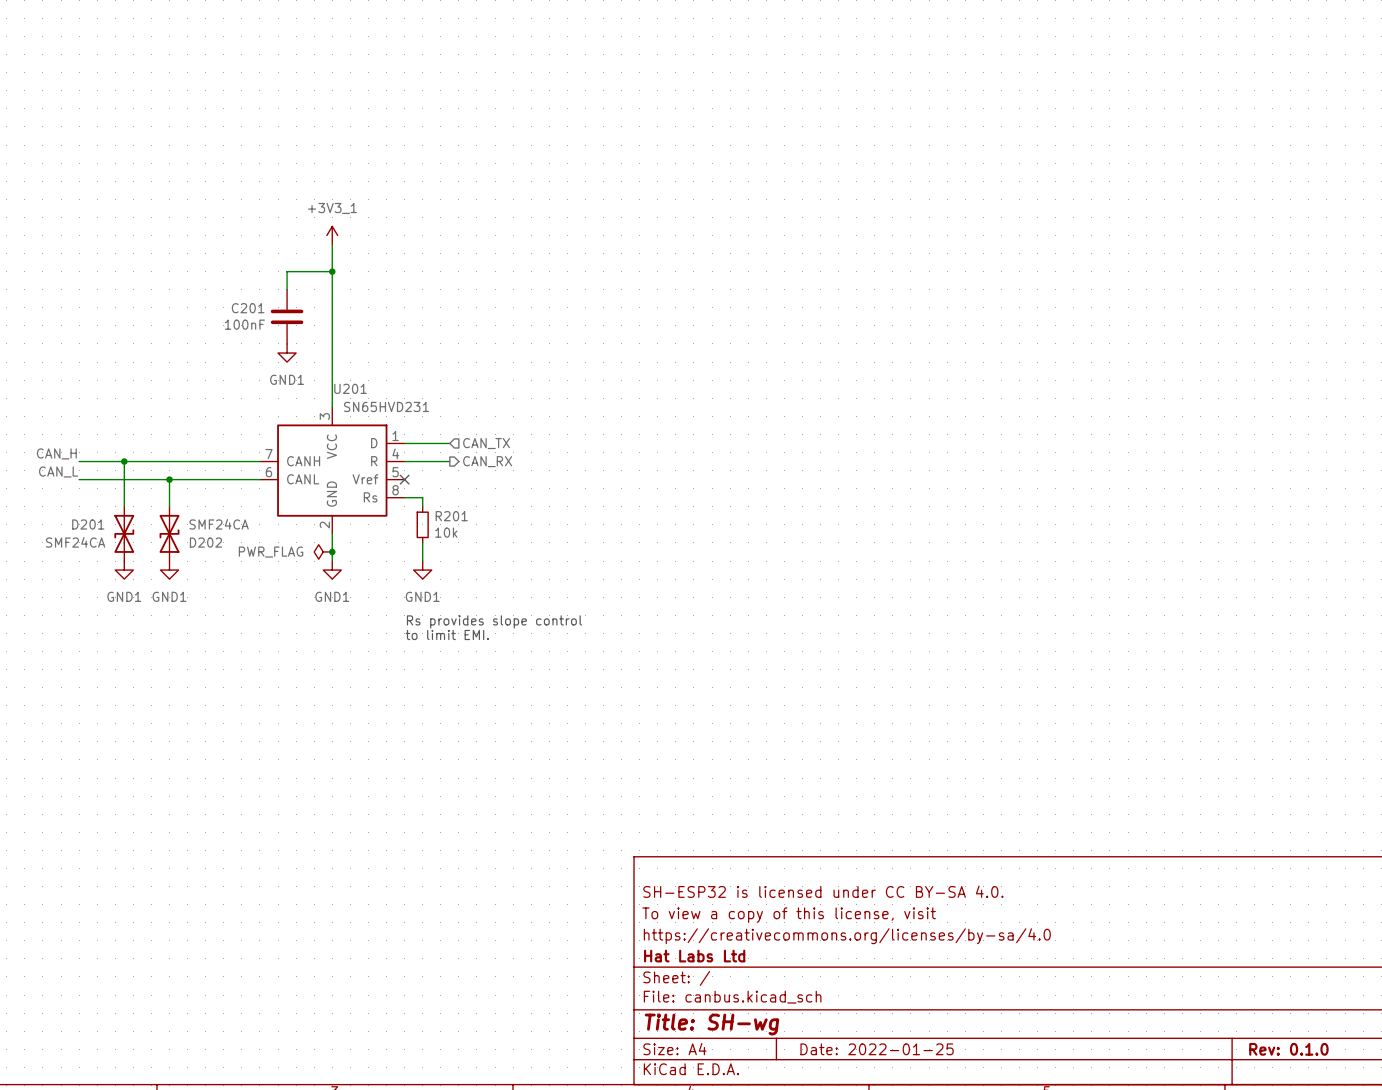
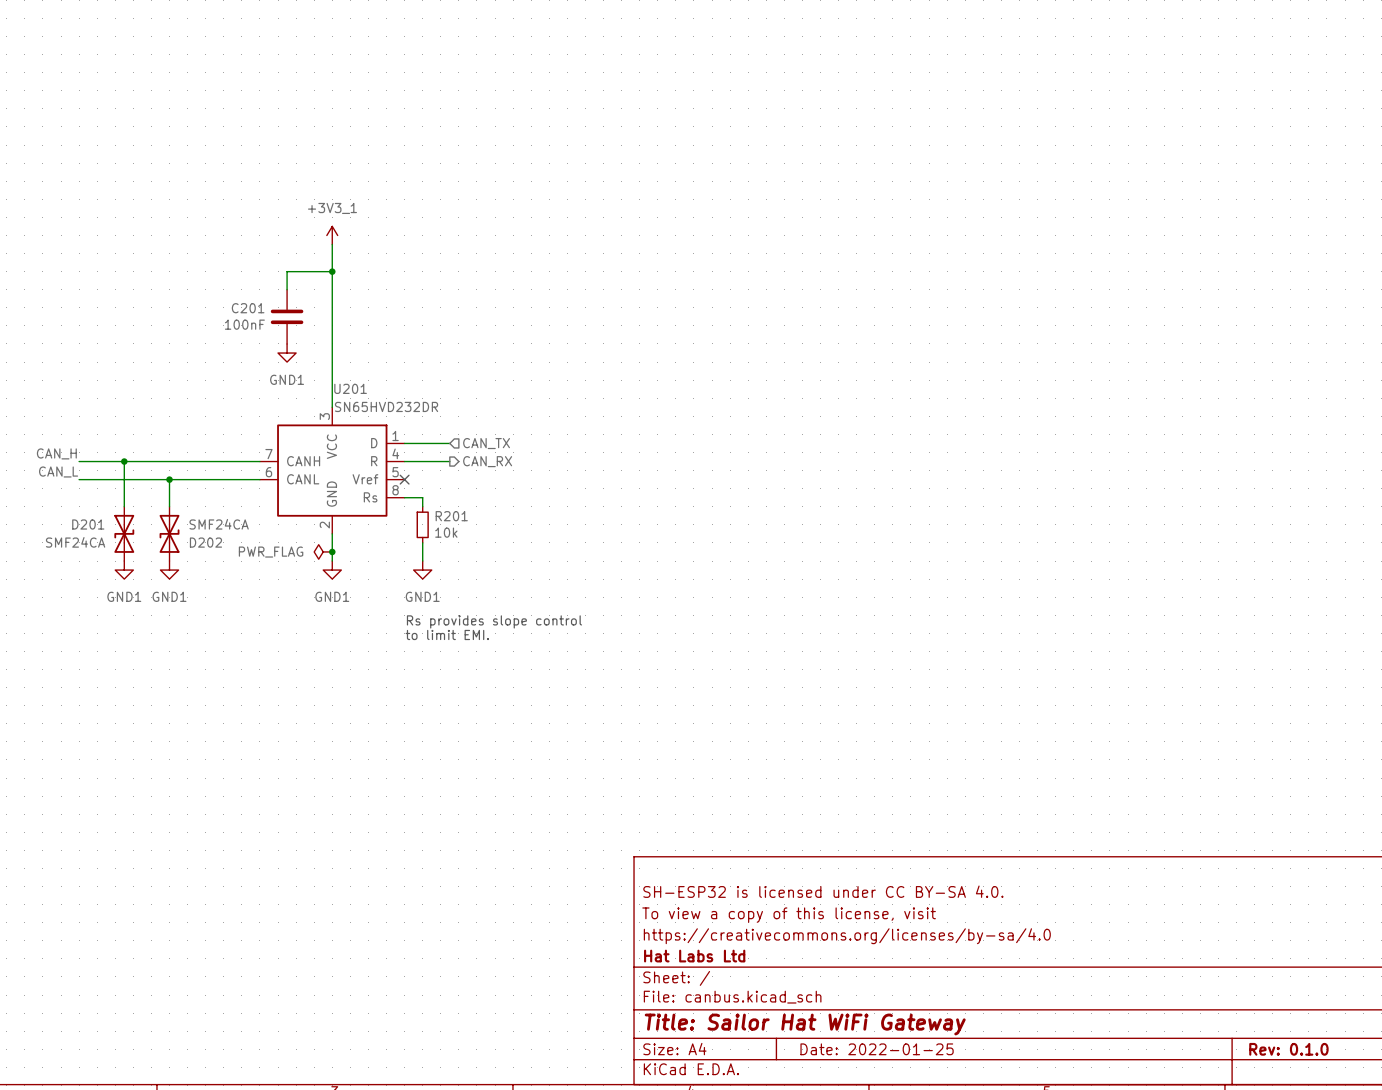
U201 value: SN65HVD231 (386, 406) -> SN65HVD232DR (386, 406)
title block: Title: SH-wg (711, 1024) -> Title: Sailor Hat WiFi Gateway (805, 1024)

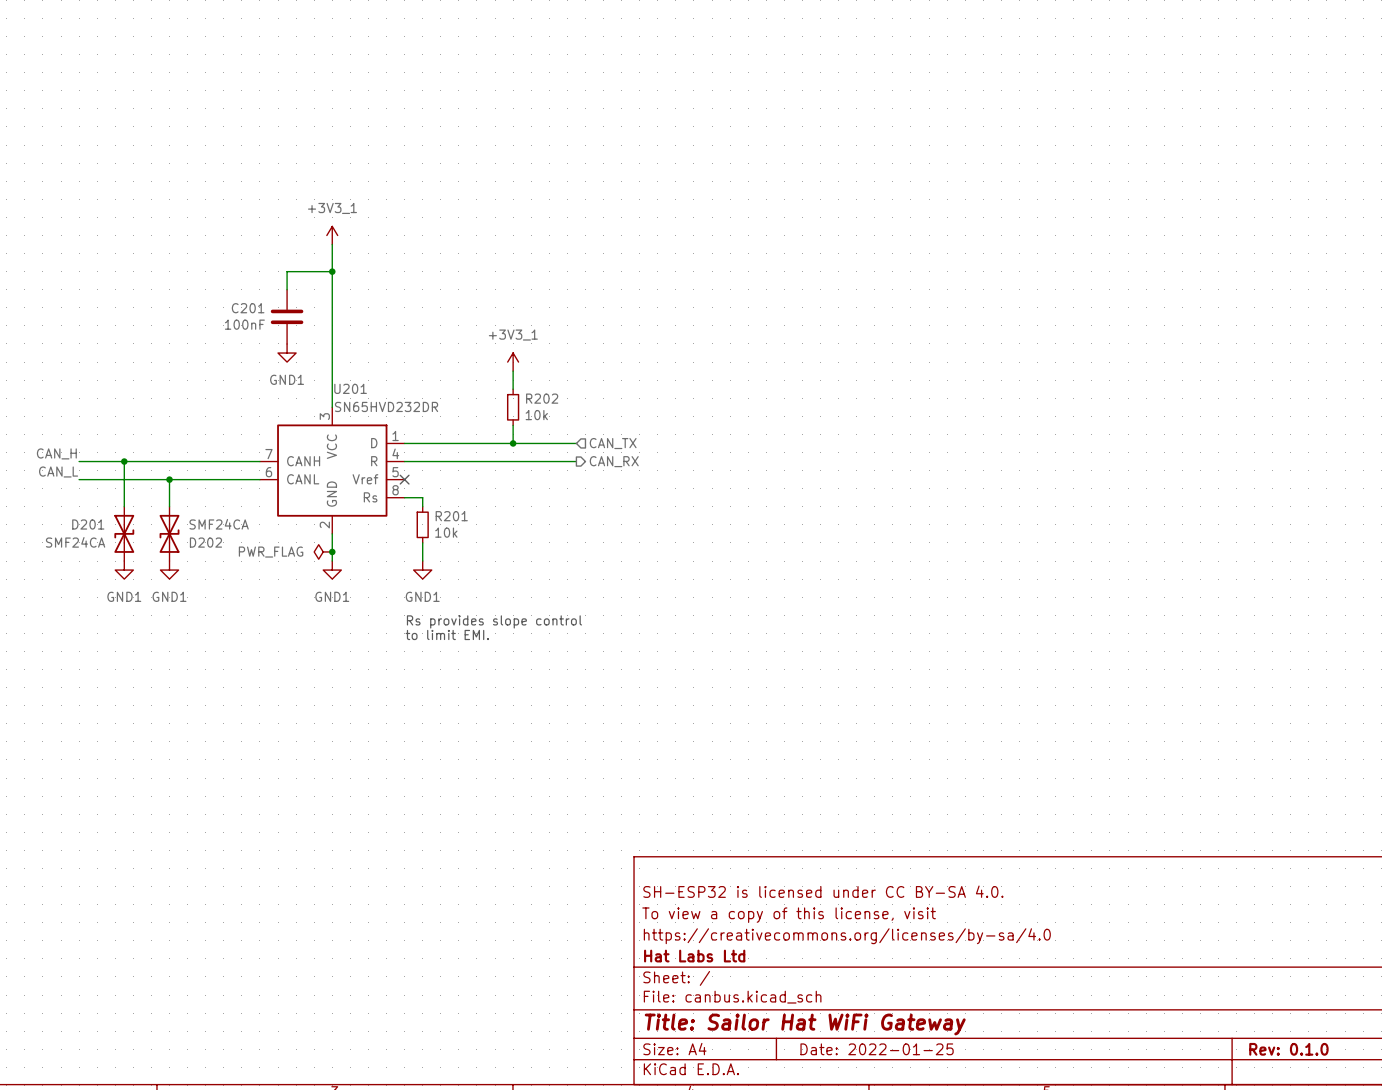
power symbol: none -> +3V3_1 (513, 362)
wire: none -> (513, 371) (513, 389)
R202: none -> 10k (513, 407)
wire: none -> (513, 425) (513, 443)
wire: none -> (449, 443) (576, 443)
hierarchical label position: CAN_TX (486, 443) -> CAN_TX (613, 443)
junction: none -> (513, 443)
wire: none -> (449, 461) (576, 461)
hierarchical label position: CAN_RX (487, 461) -> CAN_RX (614, 461)

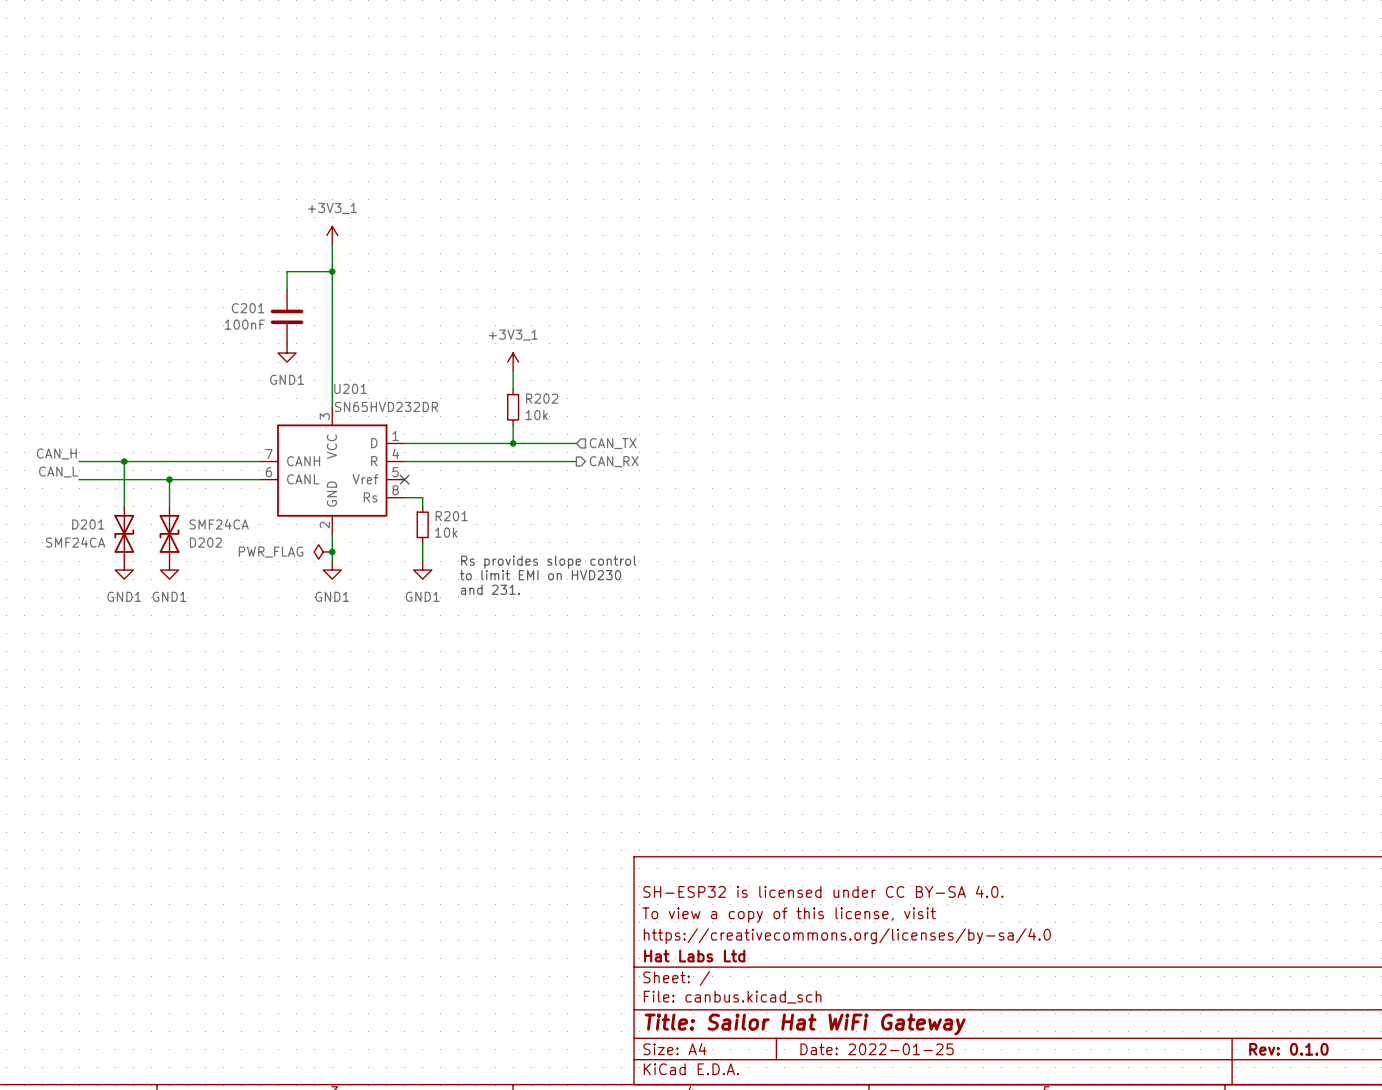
text: none -> to limit EMI on HVD230 (540, 575)
text: none -> and 231. (490, 589)
text position: Rs provides slope control (494, 621) -> Rs provides slope control (548, 562)
text: to limit EMI. (447, 634) -> none

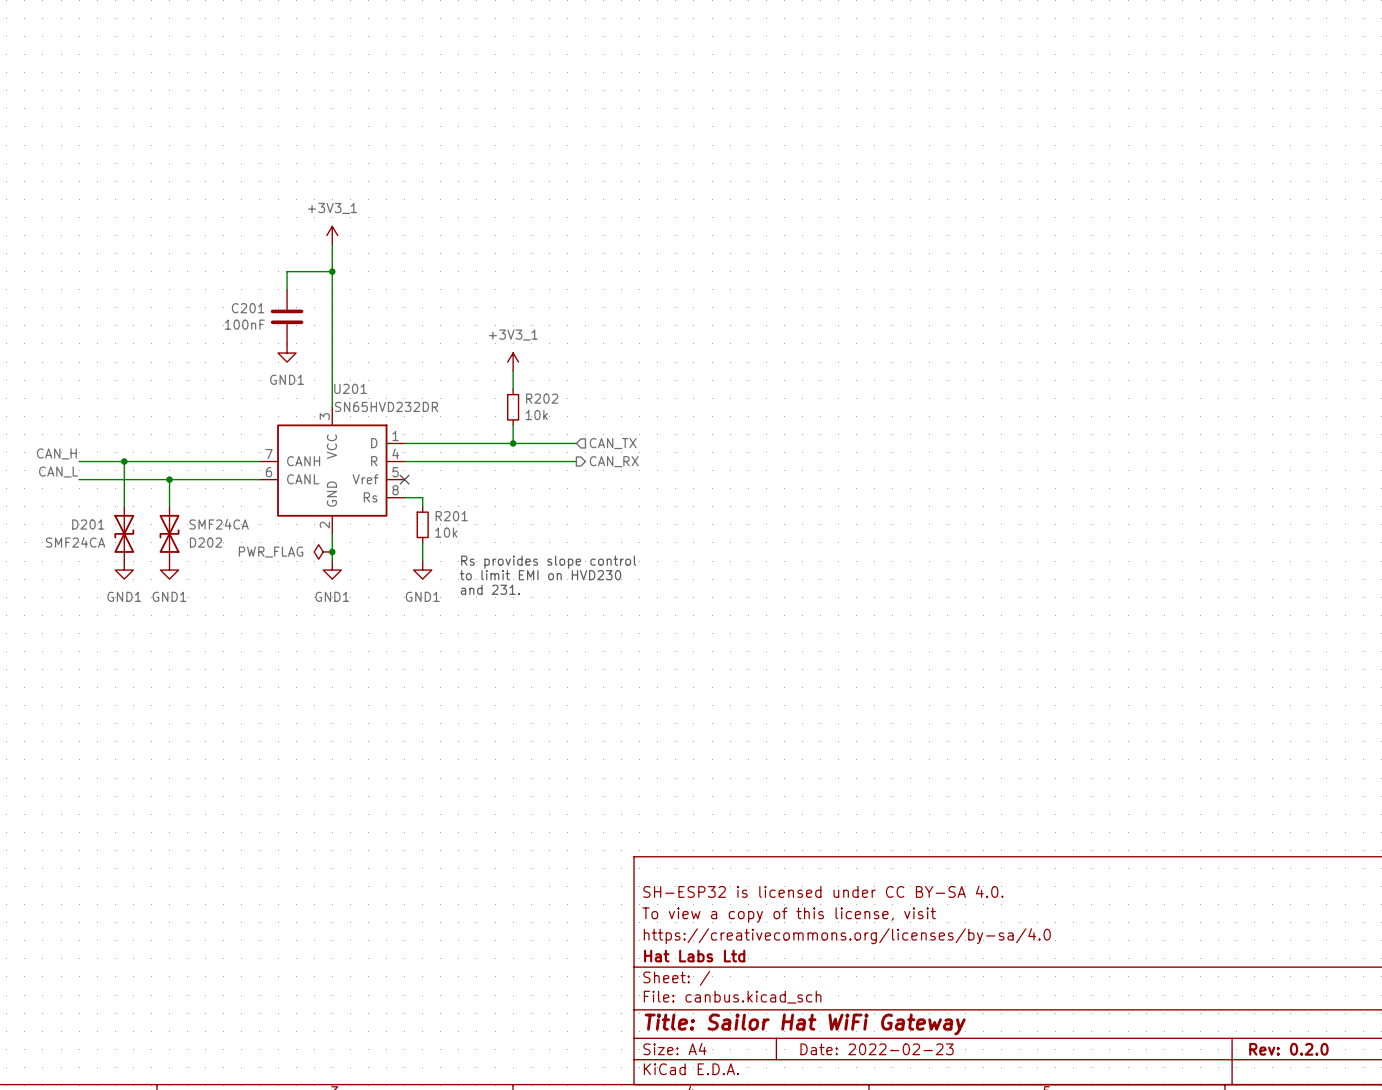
title block: Date: 2022-01-25 (877, 1049) -> Date: 2022-02-23 (877, 1049)
title block: Rev: 0.1.0 (1288, 1049) -> Rev: 0.2.0 (1288, 1049)

